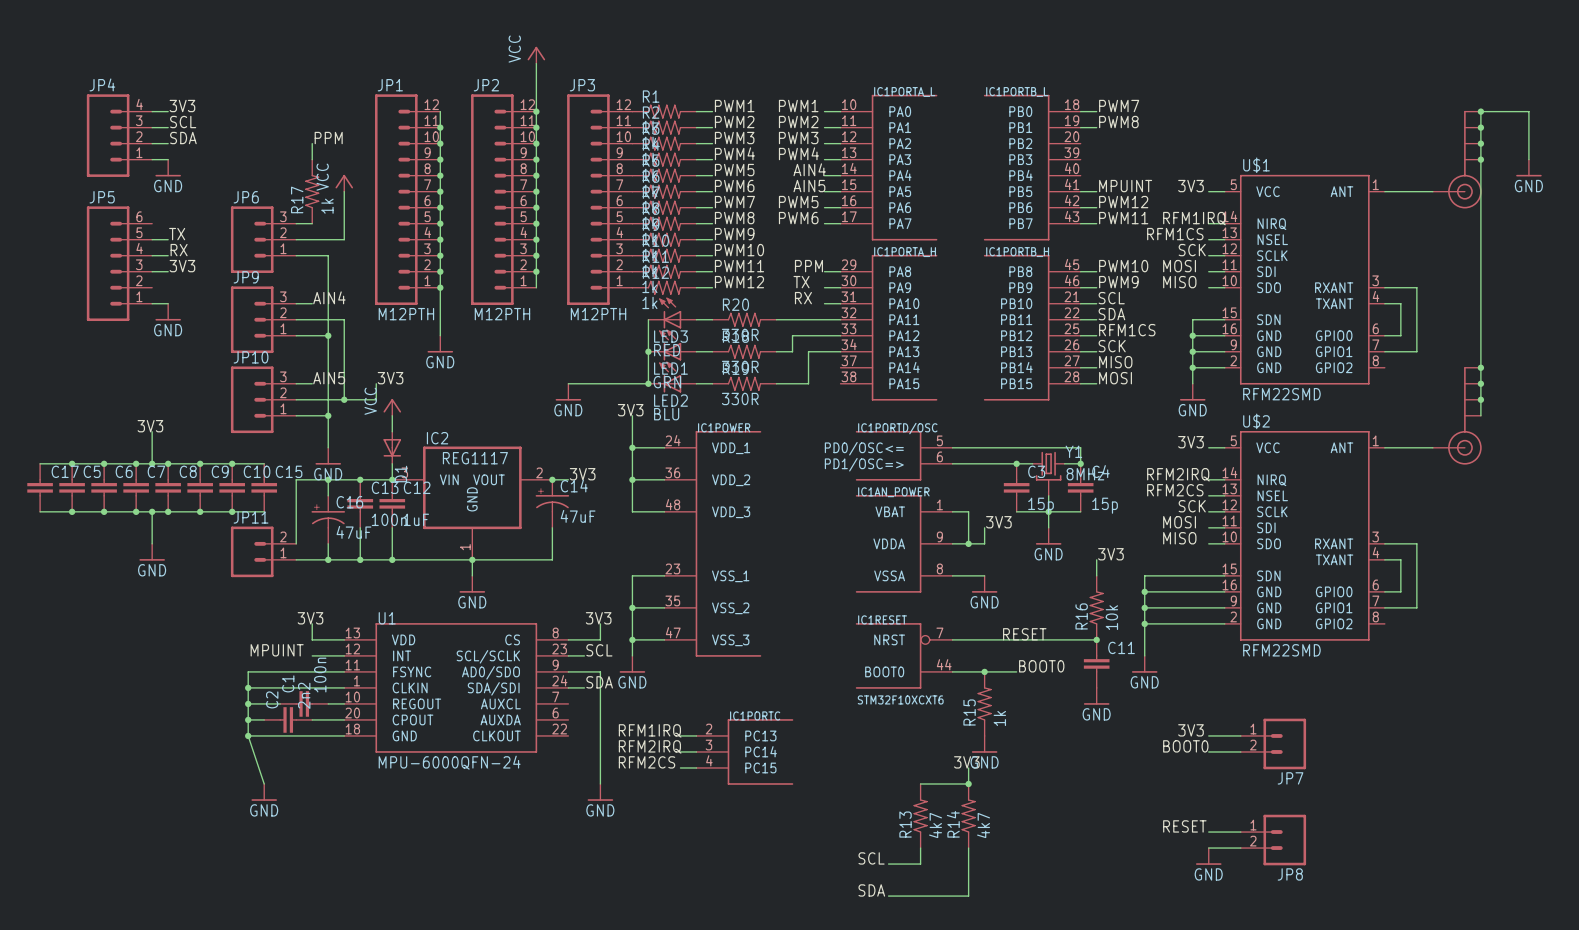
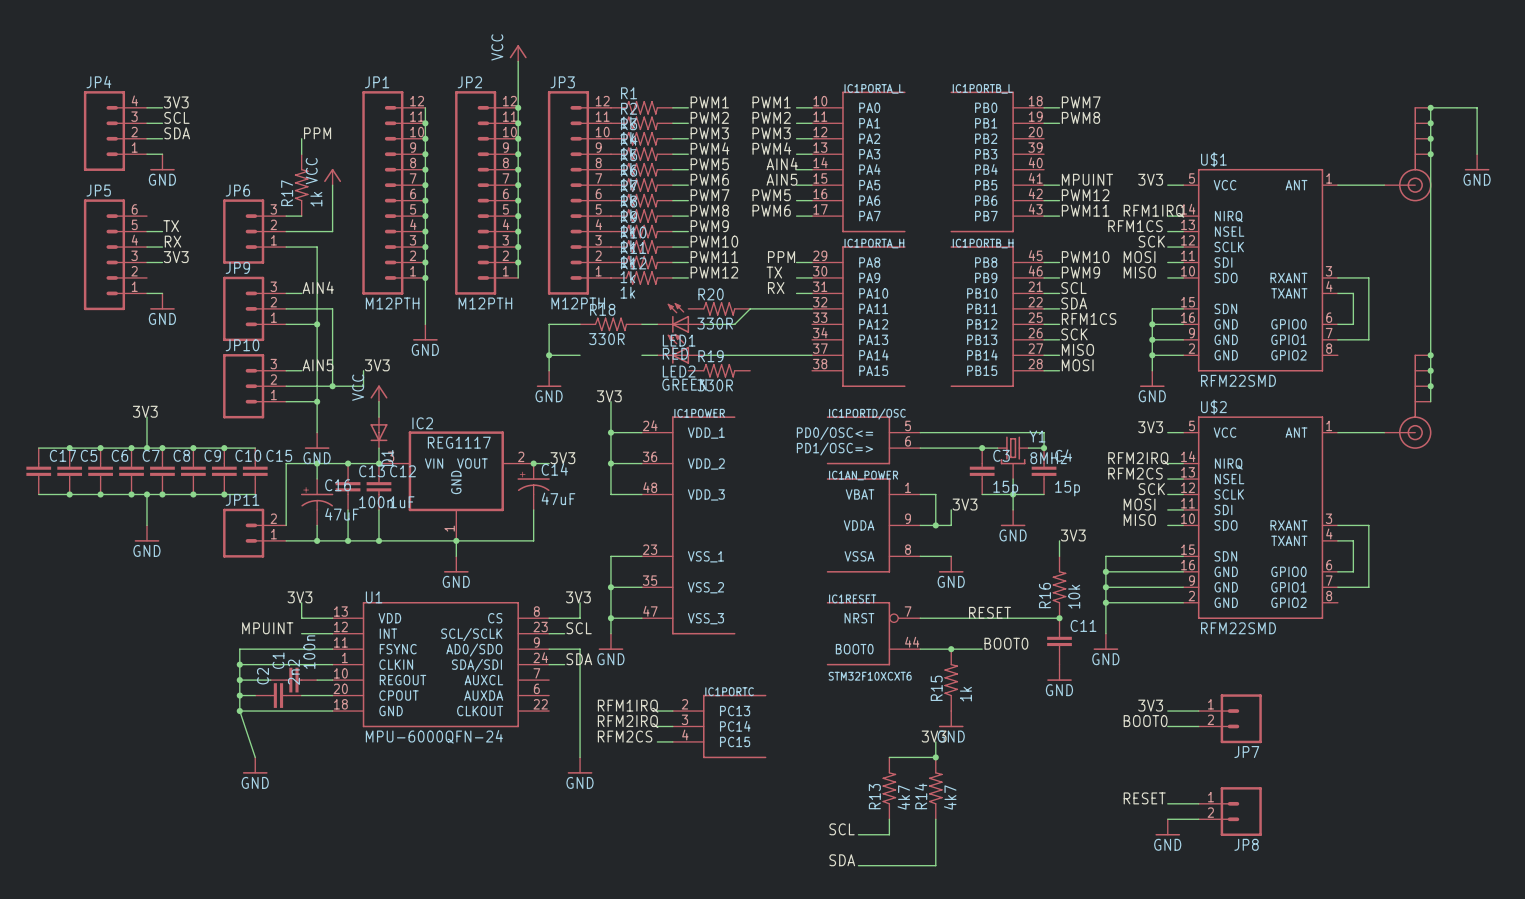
LED3: RED (672, 313) -> none
wire: (648, 319) (648, 383) (568, 383) -> (580, 324) (549, 324) (549, 370)
wire: (696, 319) (712, 319) -> (641, 324) (657, 324)
wire: none -> (750, 308) (734, 324) (703, 324)
wire: (840, 335) (792, 335) (792, 351) (776, 351) -> none
LED1 position: (672, 345) -> (680, 317)
junction: (648, 351) -> none
wire: (696, 351) (712, 351) -> (641, 355) (657, 355)
R18 position: (744, 351) -> (610, 324)
wire: (840, 351) (808, 351) (808, 383) (776, 383) -> none
wire: none -> (549, 355) (580, 355)
junction: none -> (549, 355)
wire: none -> (703, 355) (812, 355)
LED2 position: (672, 377) -> (680, 348)
LED1 value: GRN (667, 382) -> RED (675, 353)
junction: (648, 383) -> none
wire: (696, 383) (712, 383) -> none
LED2 value: BLU (666, 414) -> GREEN (684, 384)

